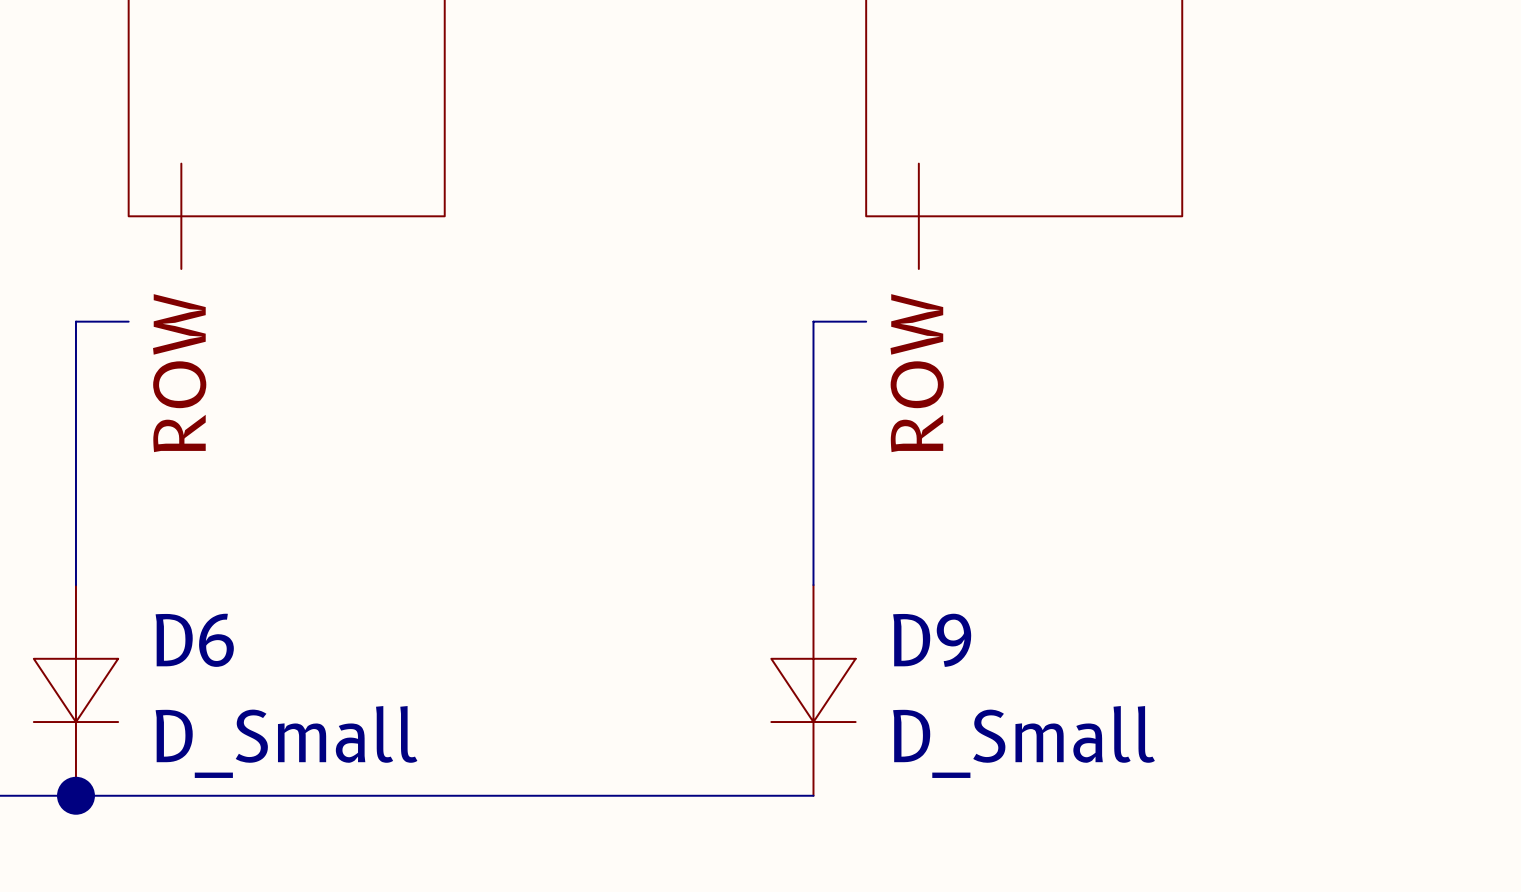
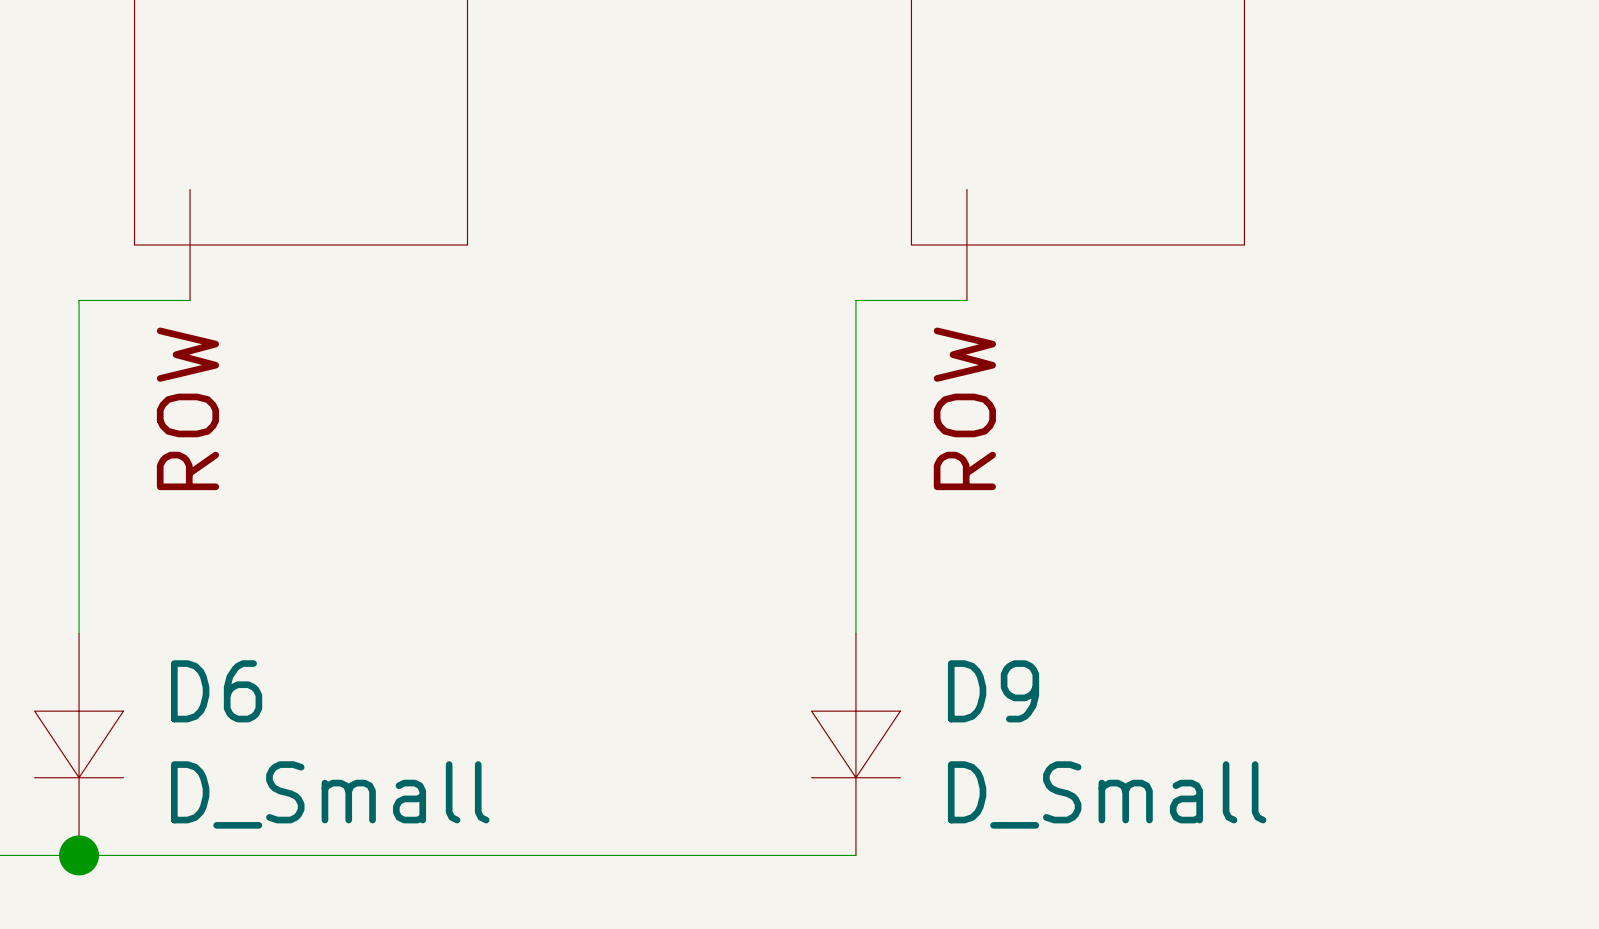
wire: (75, 321) (128, 321) -> (79, 355) (79, 300) (190, 300)
wire: (813, 321) (866, 321) -> (855, 355) (855, 300) (966, 300)

